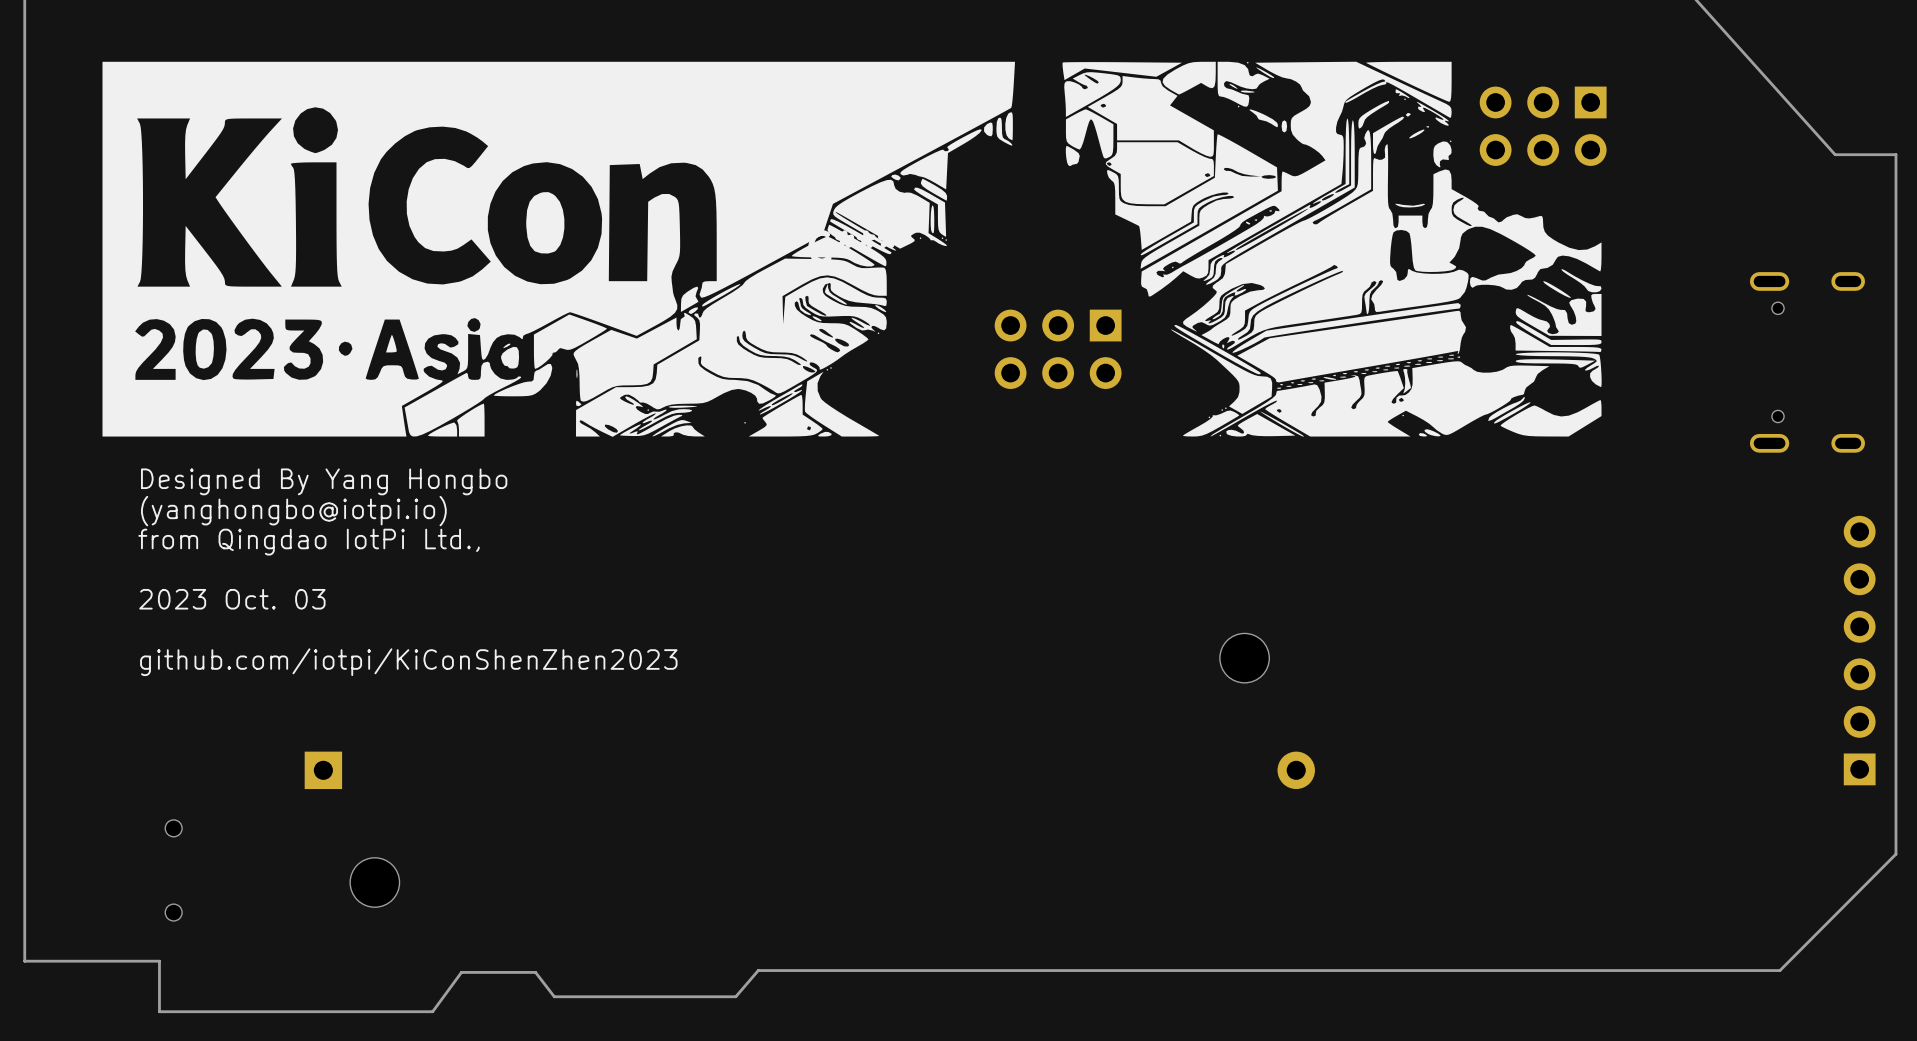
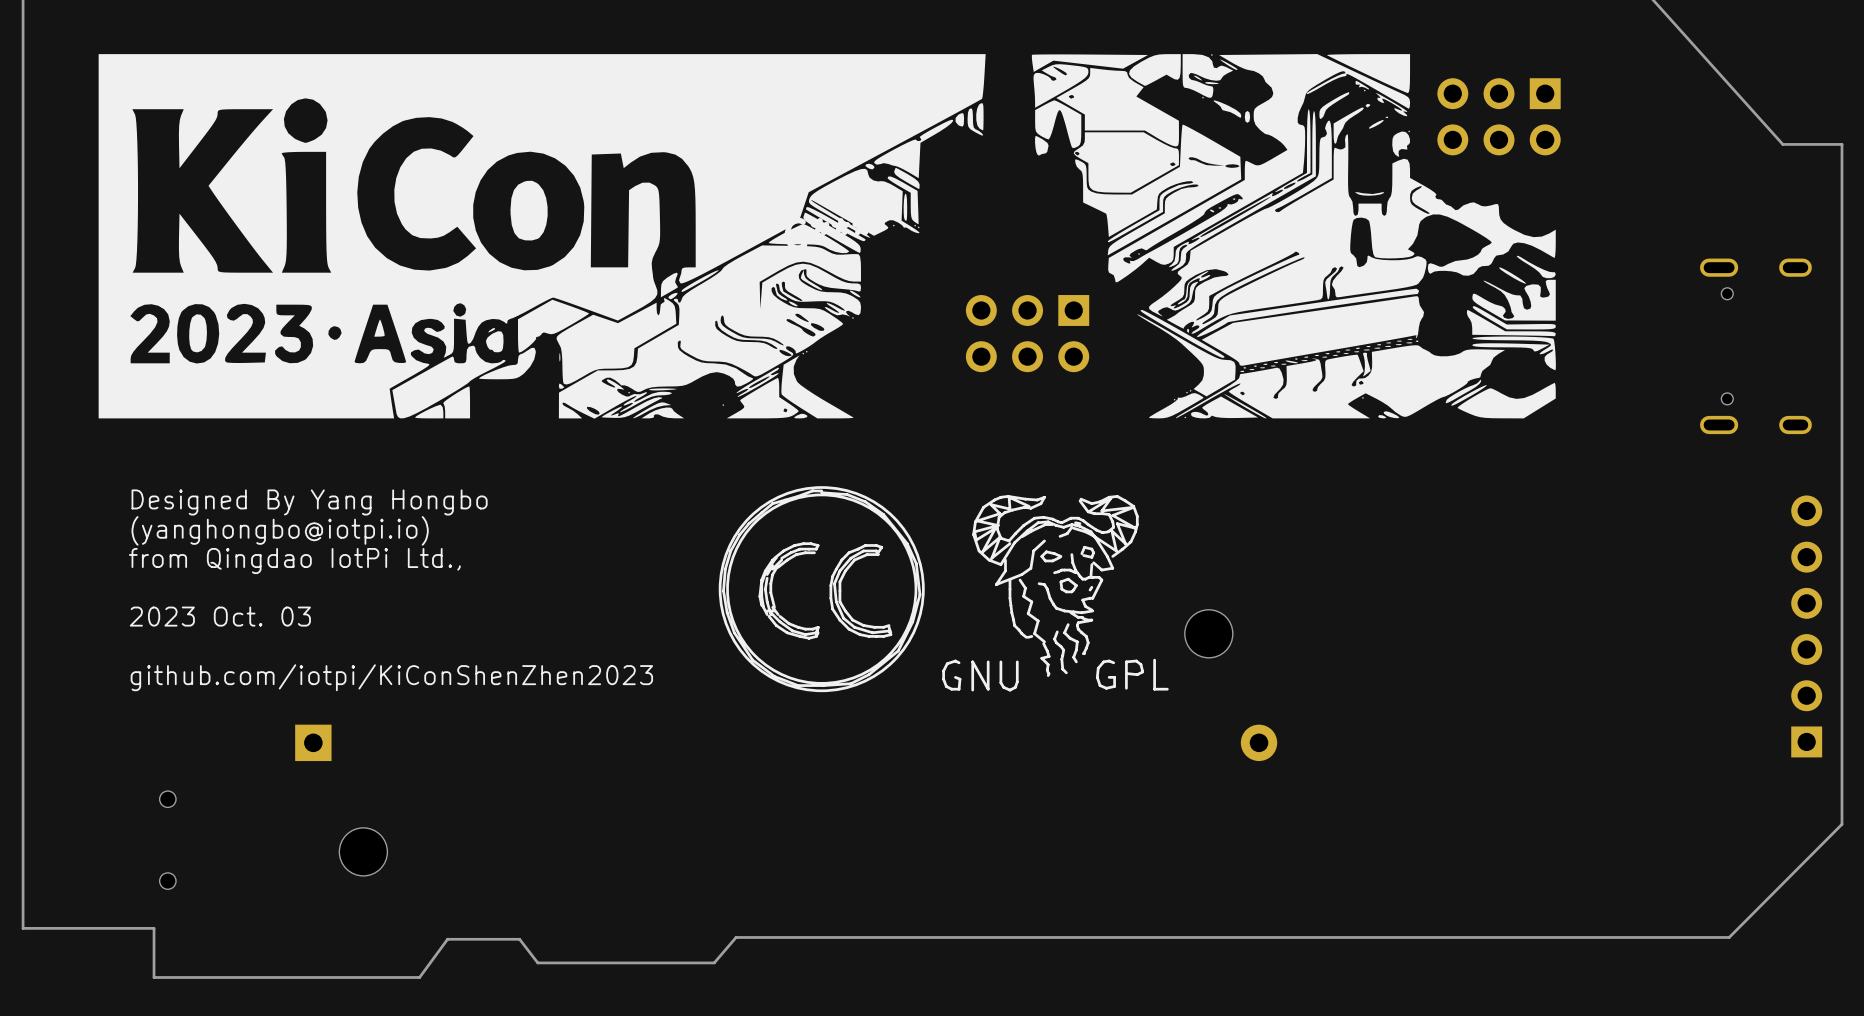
text position: Designed By Yang Hongbo (324, 481) -> Designed By Yang Hongbo (309, 502)
drawing: none -> [718, 486, 1169, 693]
text position: (yanghongbo@iotpi.io) (293, 511) -> (yanghongbo@iotpi.io) (280, 530)
text position: from Qingdao IotPi Ltd., (309, 542) -> from Qingdao IotPi Ltd., (294, 561)
text position: 2023 Oct. 03 (232, 599) -> 2023 Oct. 03 (220, 616)
text position: github.com/iotpi/KiConShenZhen2023 (408, 662) -> github.com/iotpi/KiConShenZhen2023 (391, 677)

